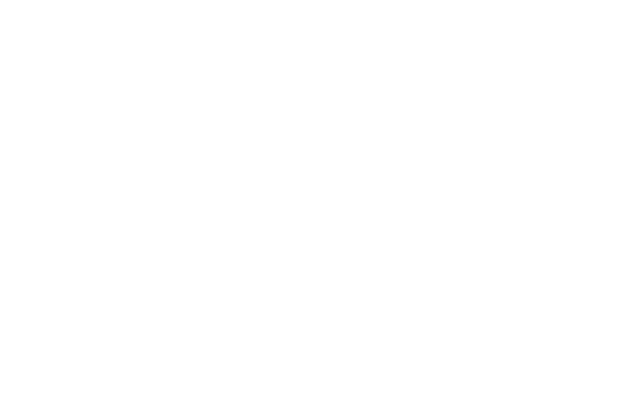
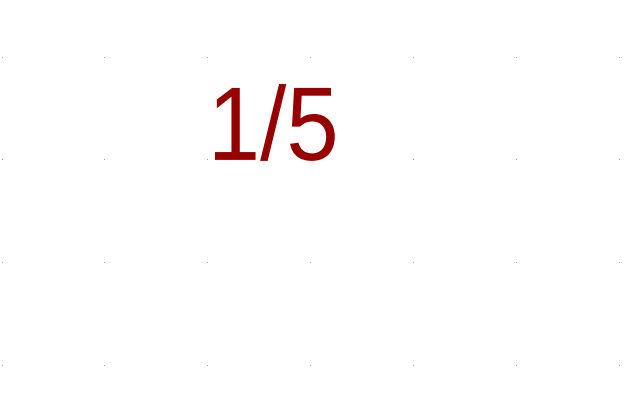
text: none -> 1/5 (274, 122)

